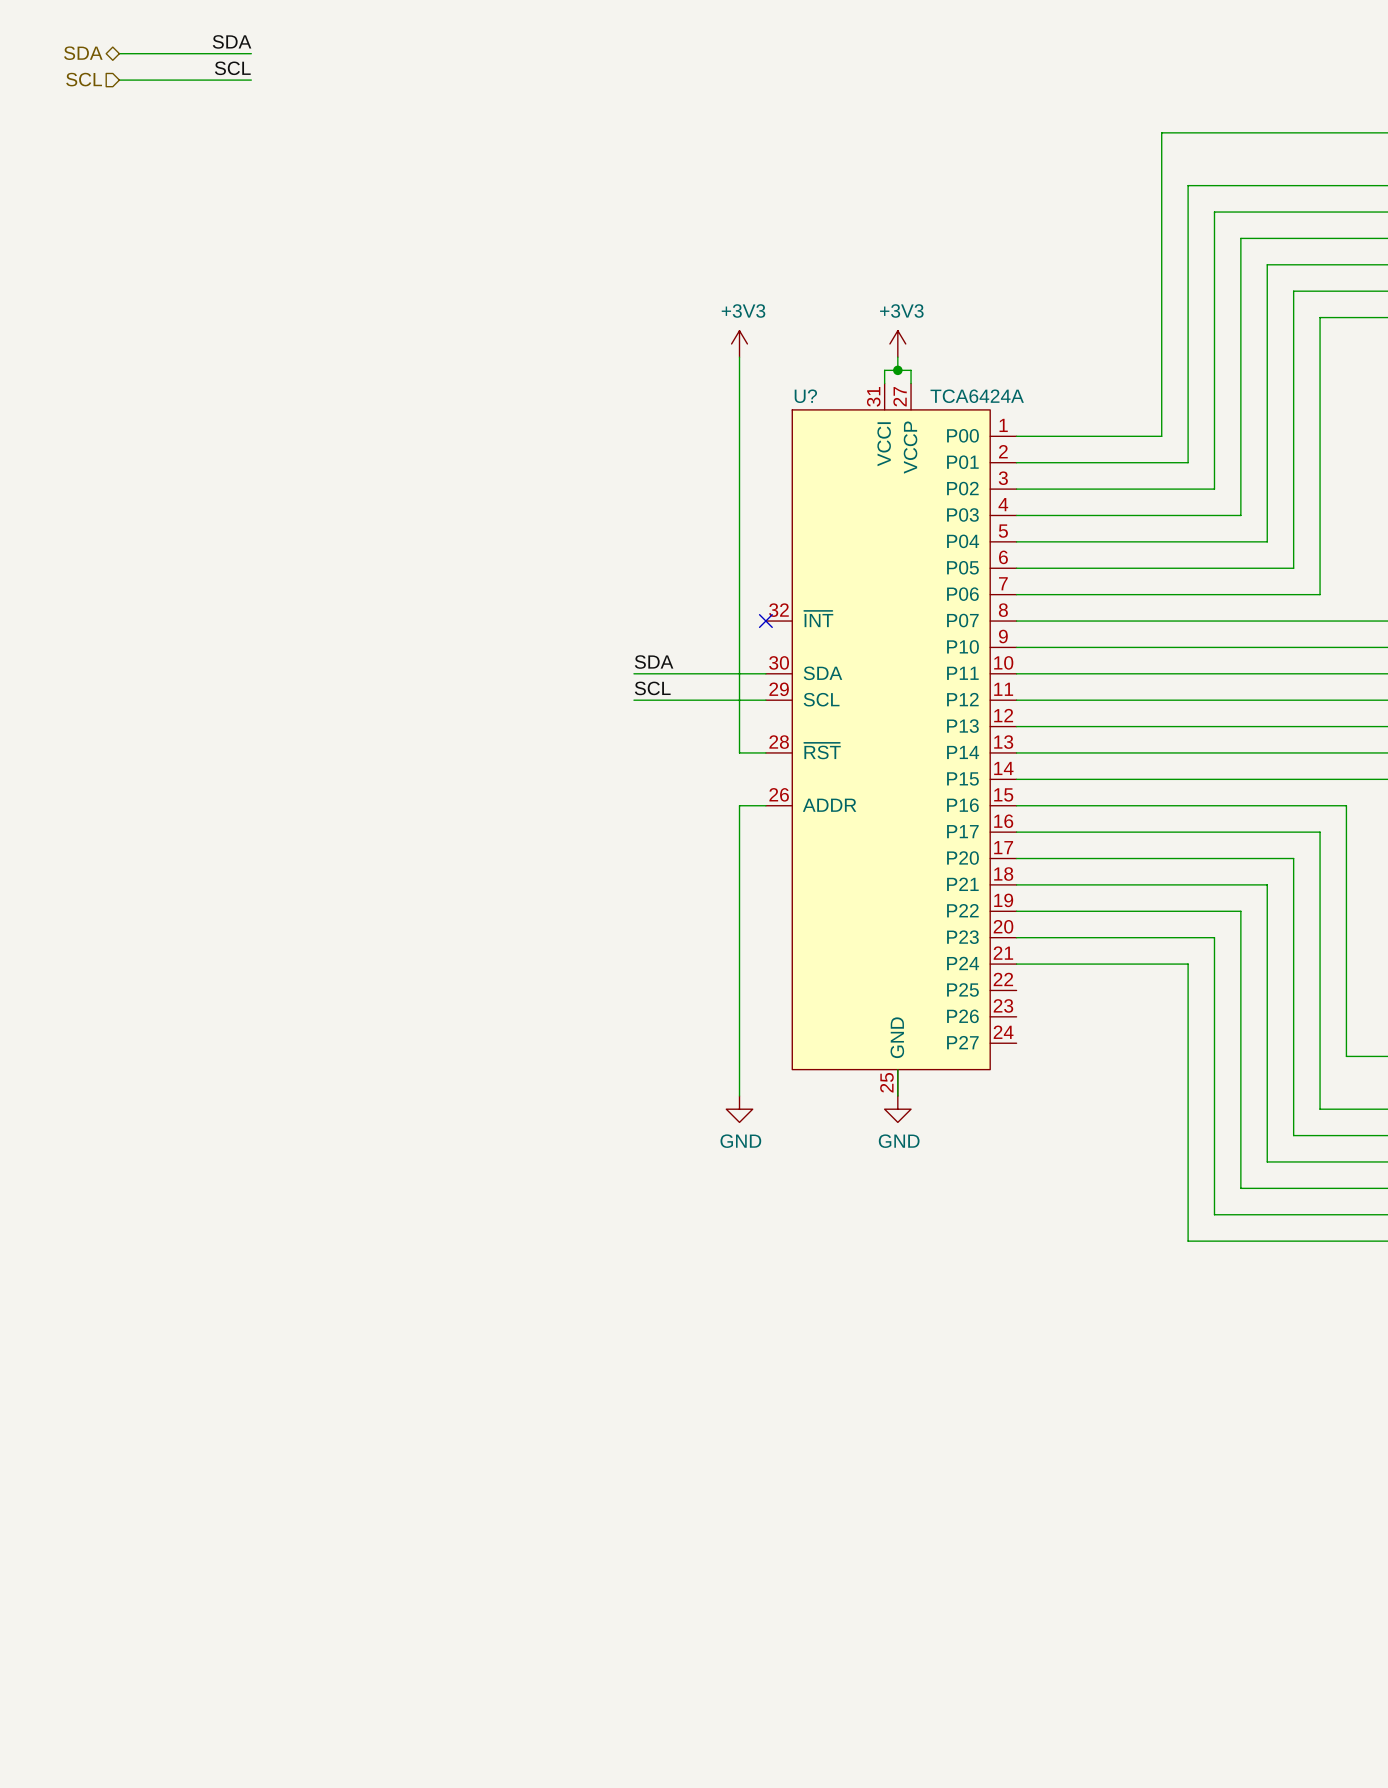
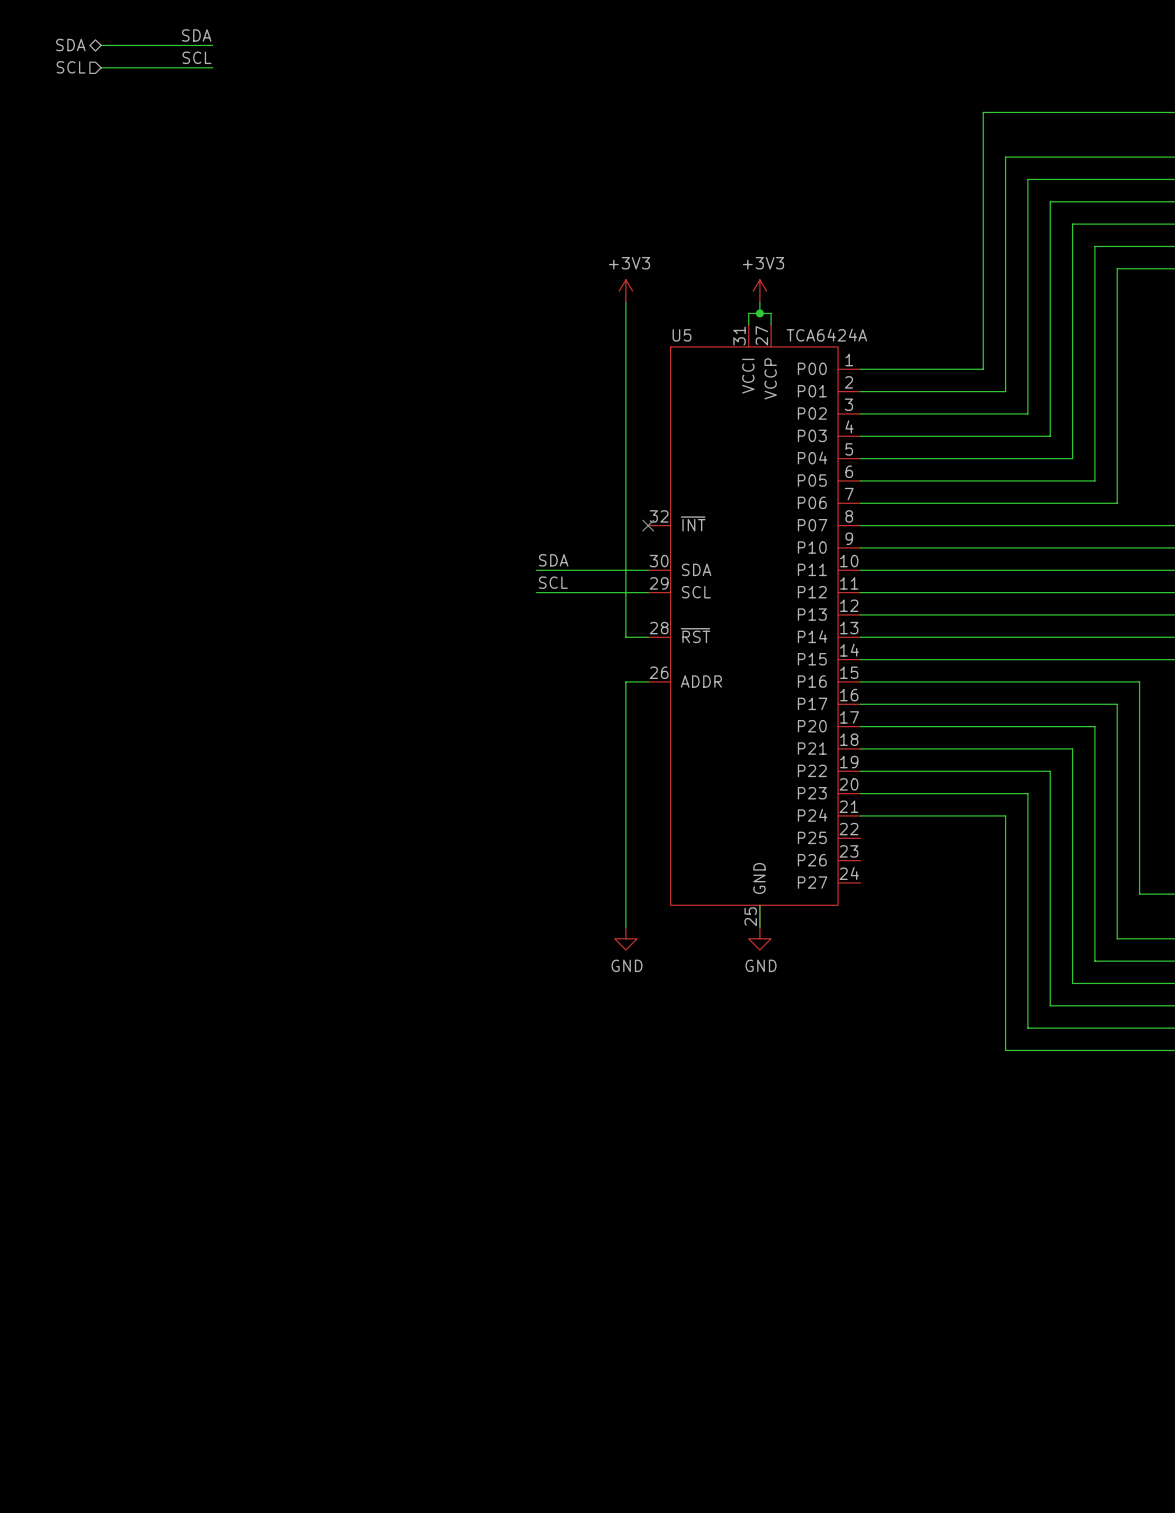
U? name: U? (805, 396) -> U5 (682, 335)

